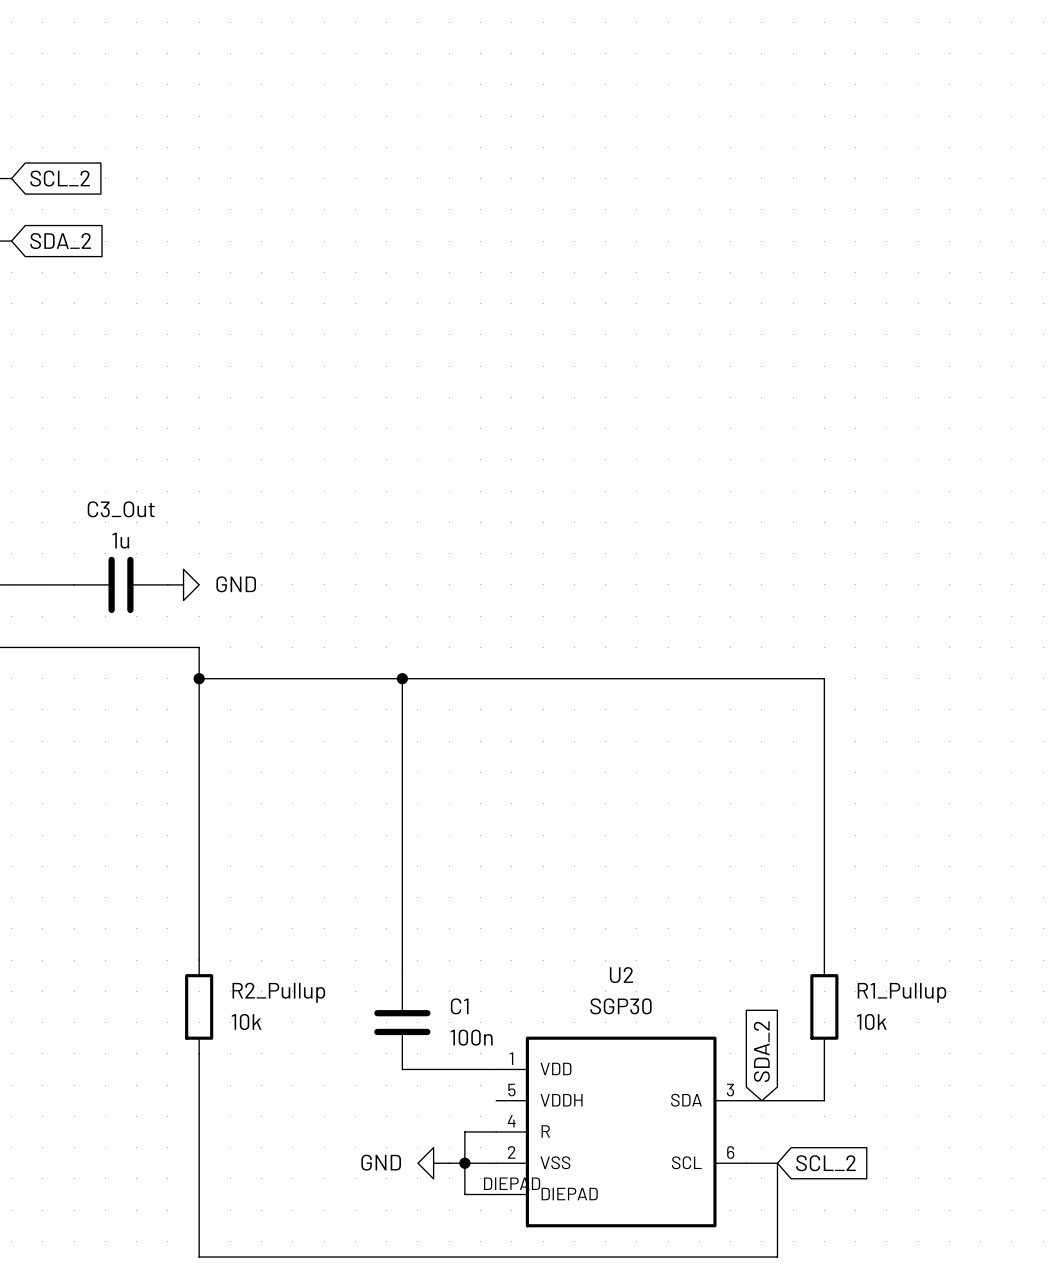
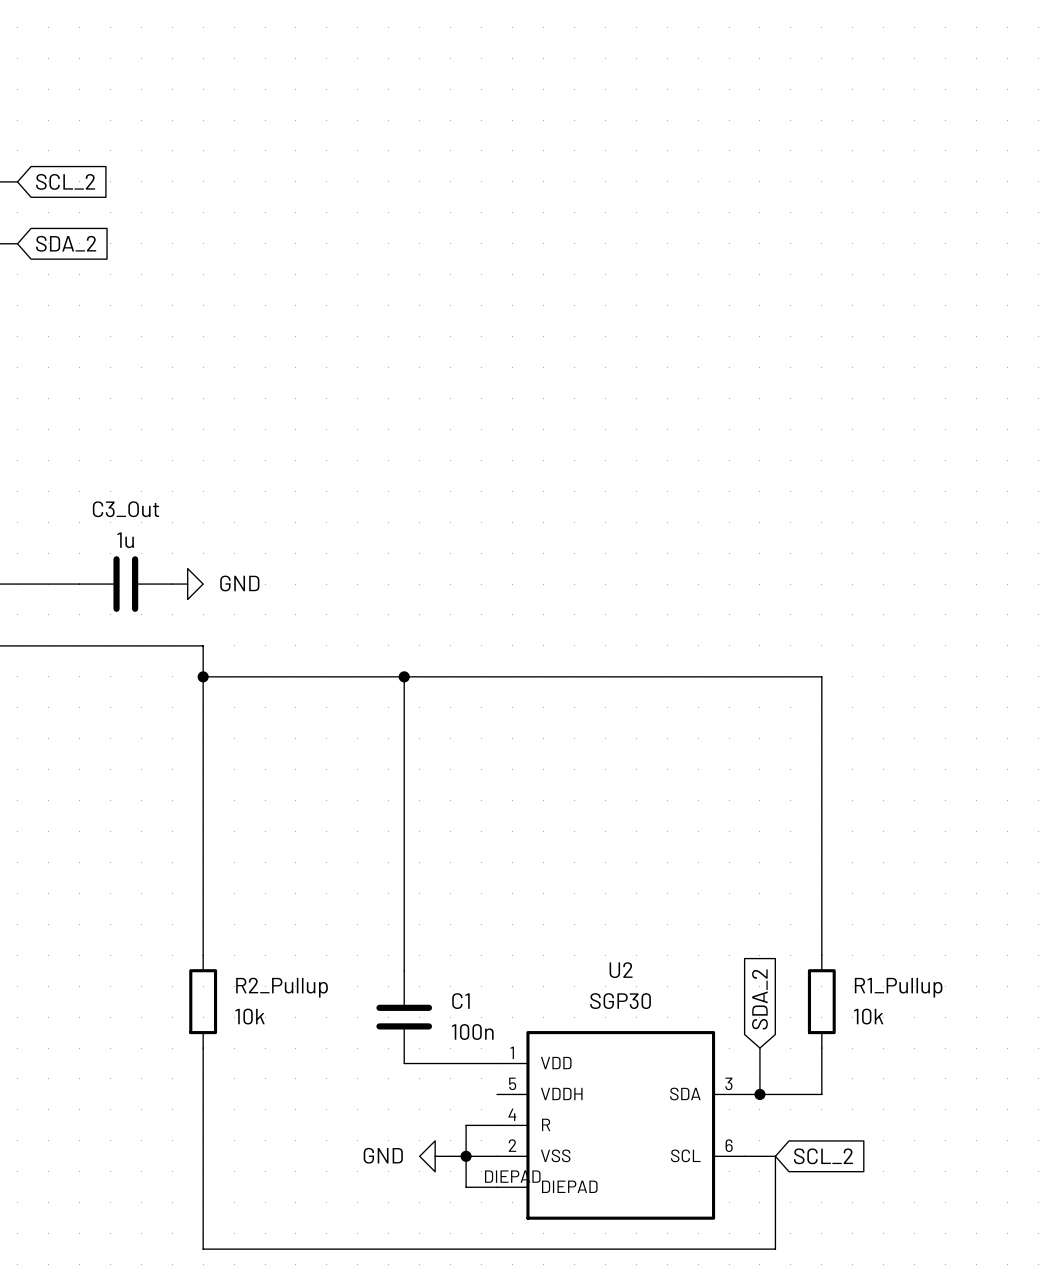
global label position: SDA_2 (761, 1051) -> SDA_2 (759, 999)
wire: none -> (759, 1048) (759, 1094)
junction: none -> (759, 1094)

